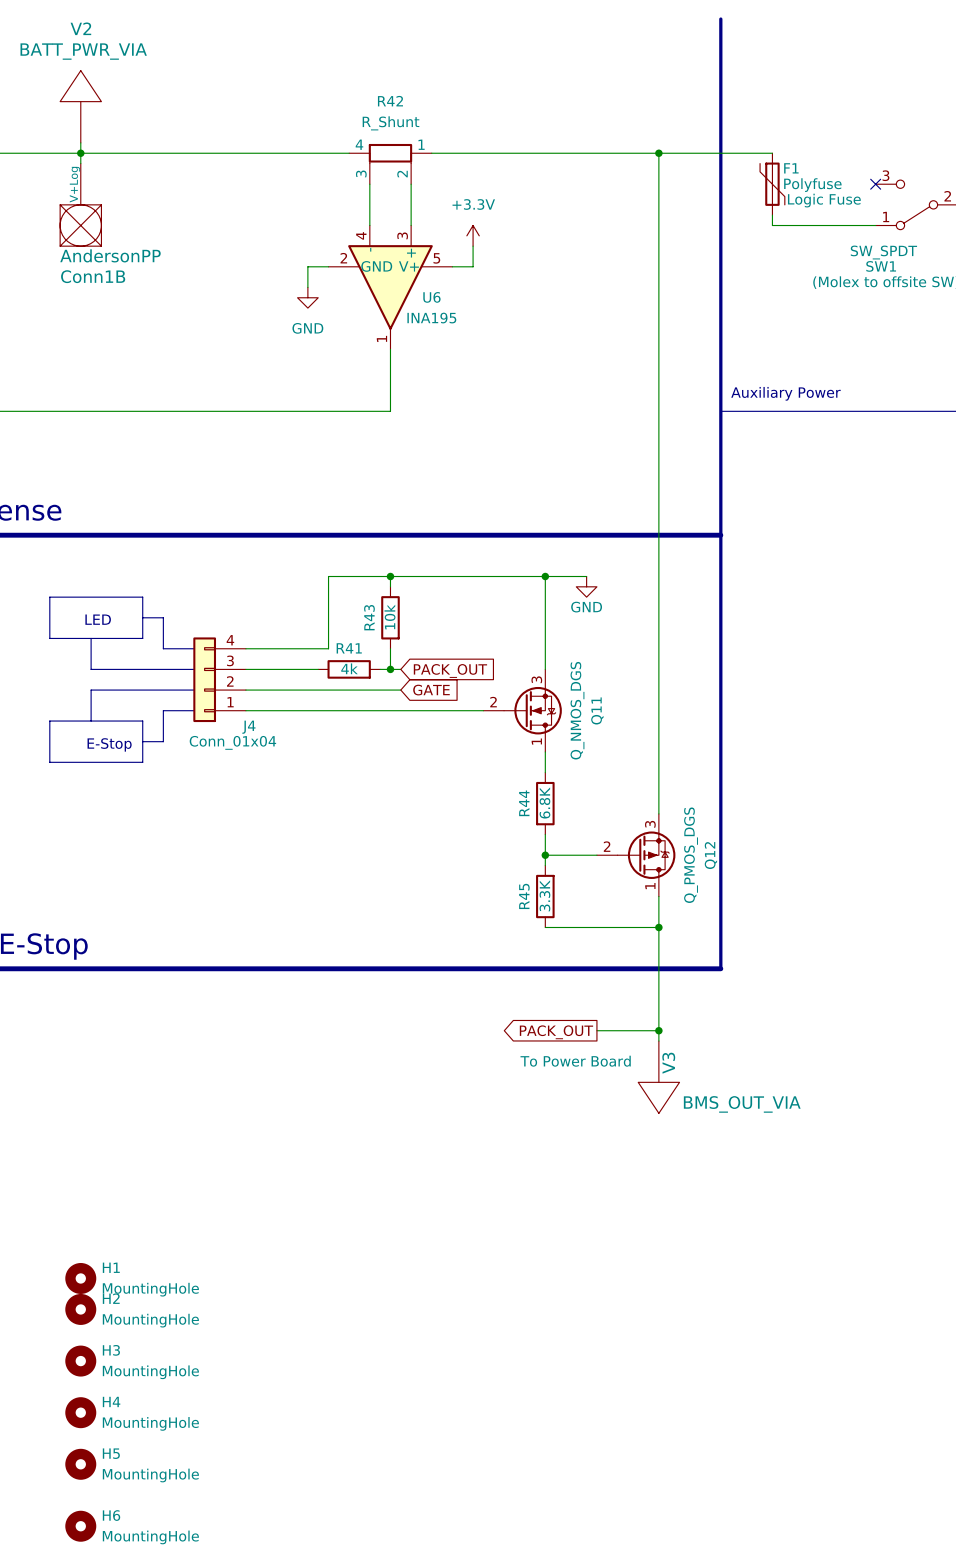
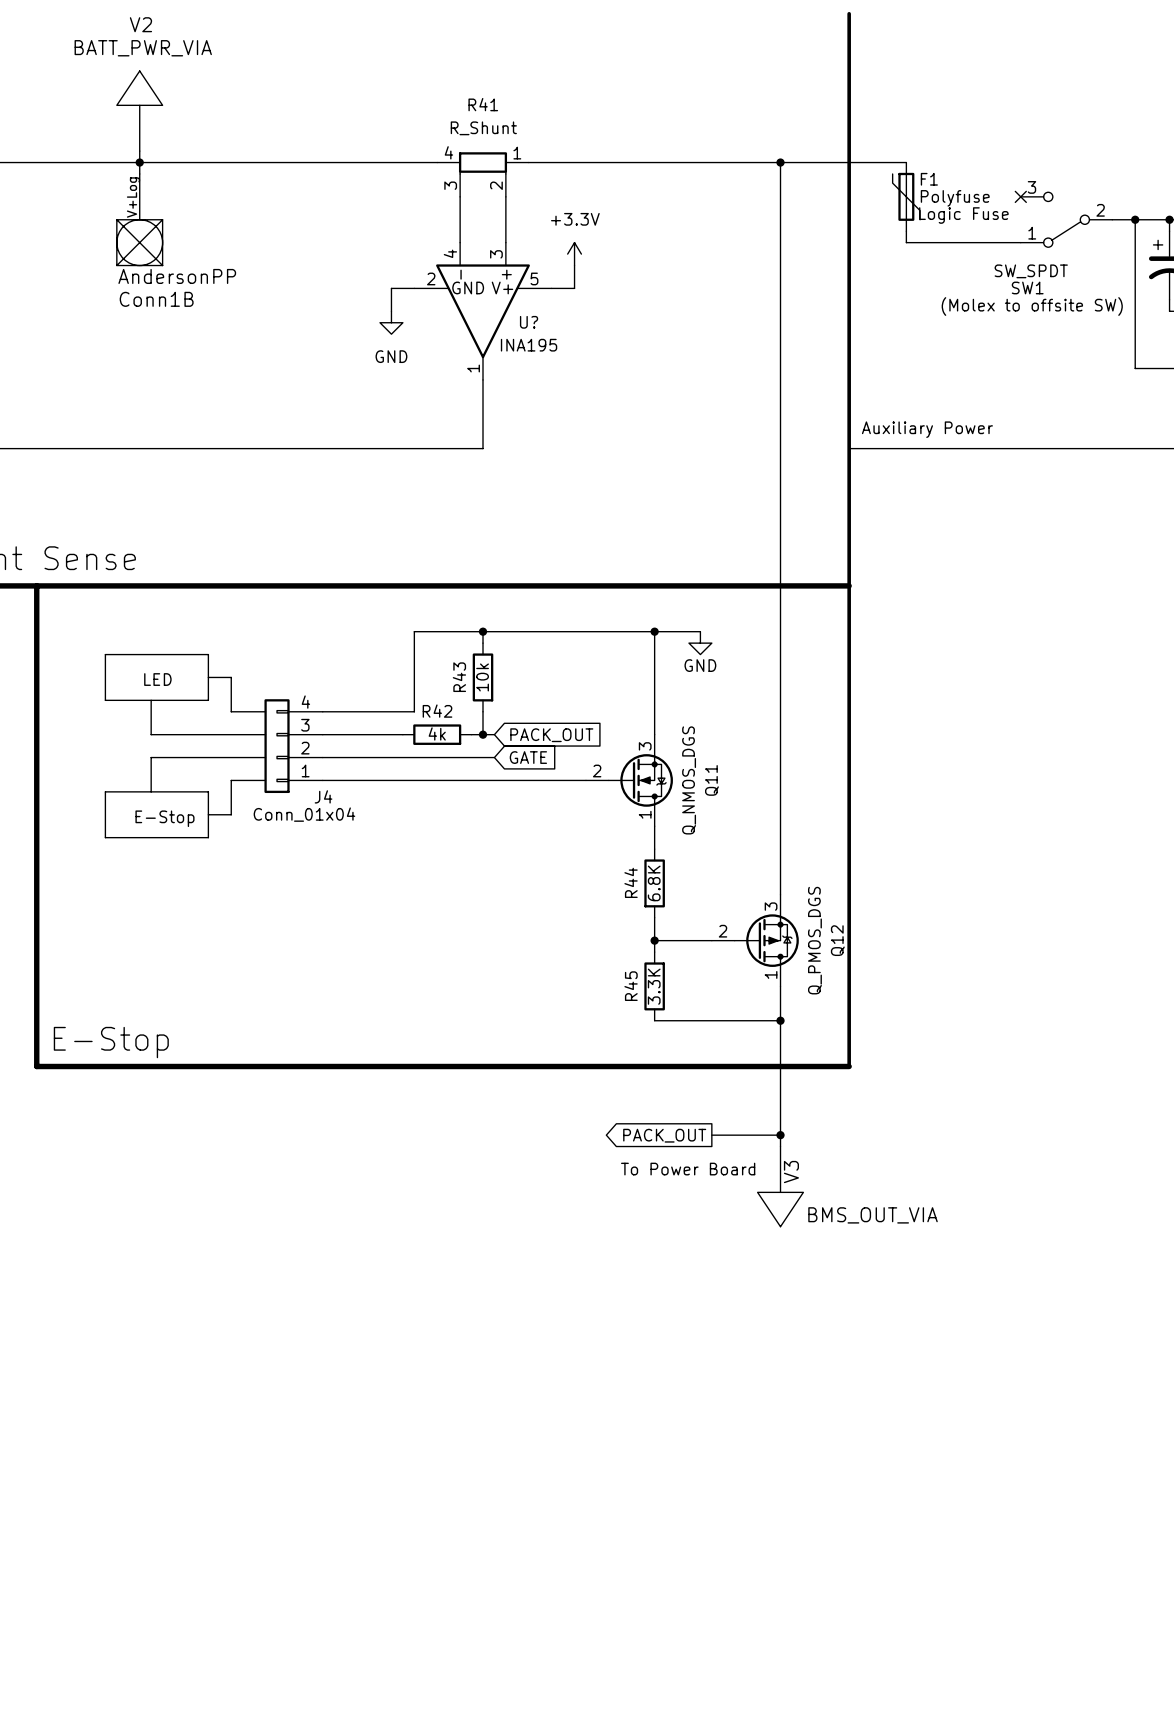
R42 name: R42 (390, 101) -> R41 (483, 104)
U6 name: U6 (431, 297) -> U? (529, 322)
R41 name: R41 (349, 648) -> R42 (437, 711)
H1: MountingHole (80, 1278) -> none
H2: MountingHole (80, 1309) -> none
H3: MountingHole (80, 1361) -> none
H4: MountingHole (80, 1412) -> none
H5: MountingHole (80, 1464) -> none
H6: MountingHole (80, 1526) -> none

